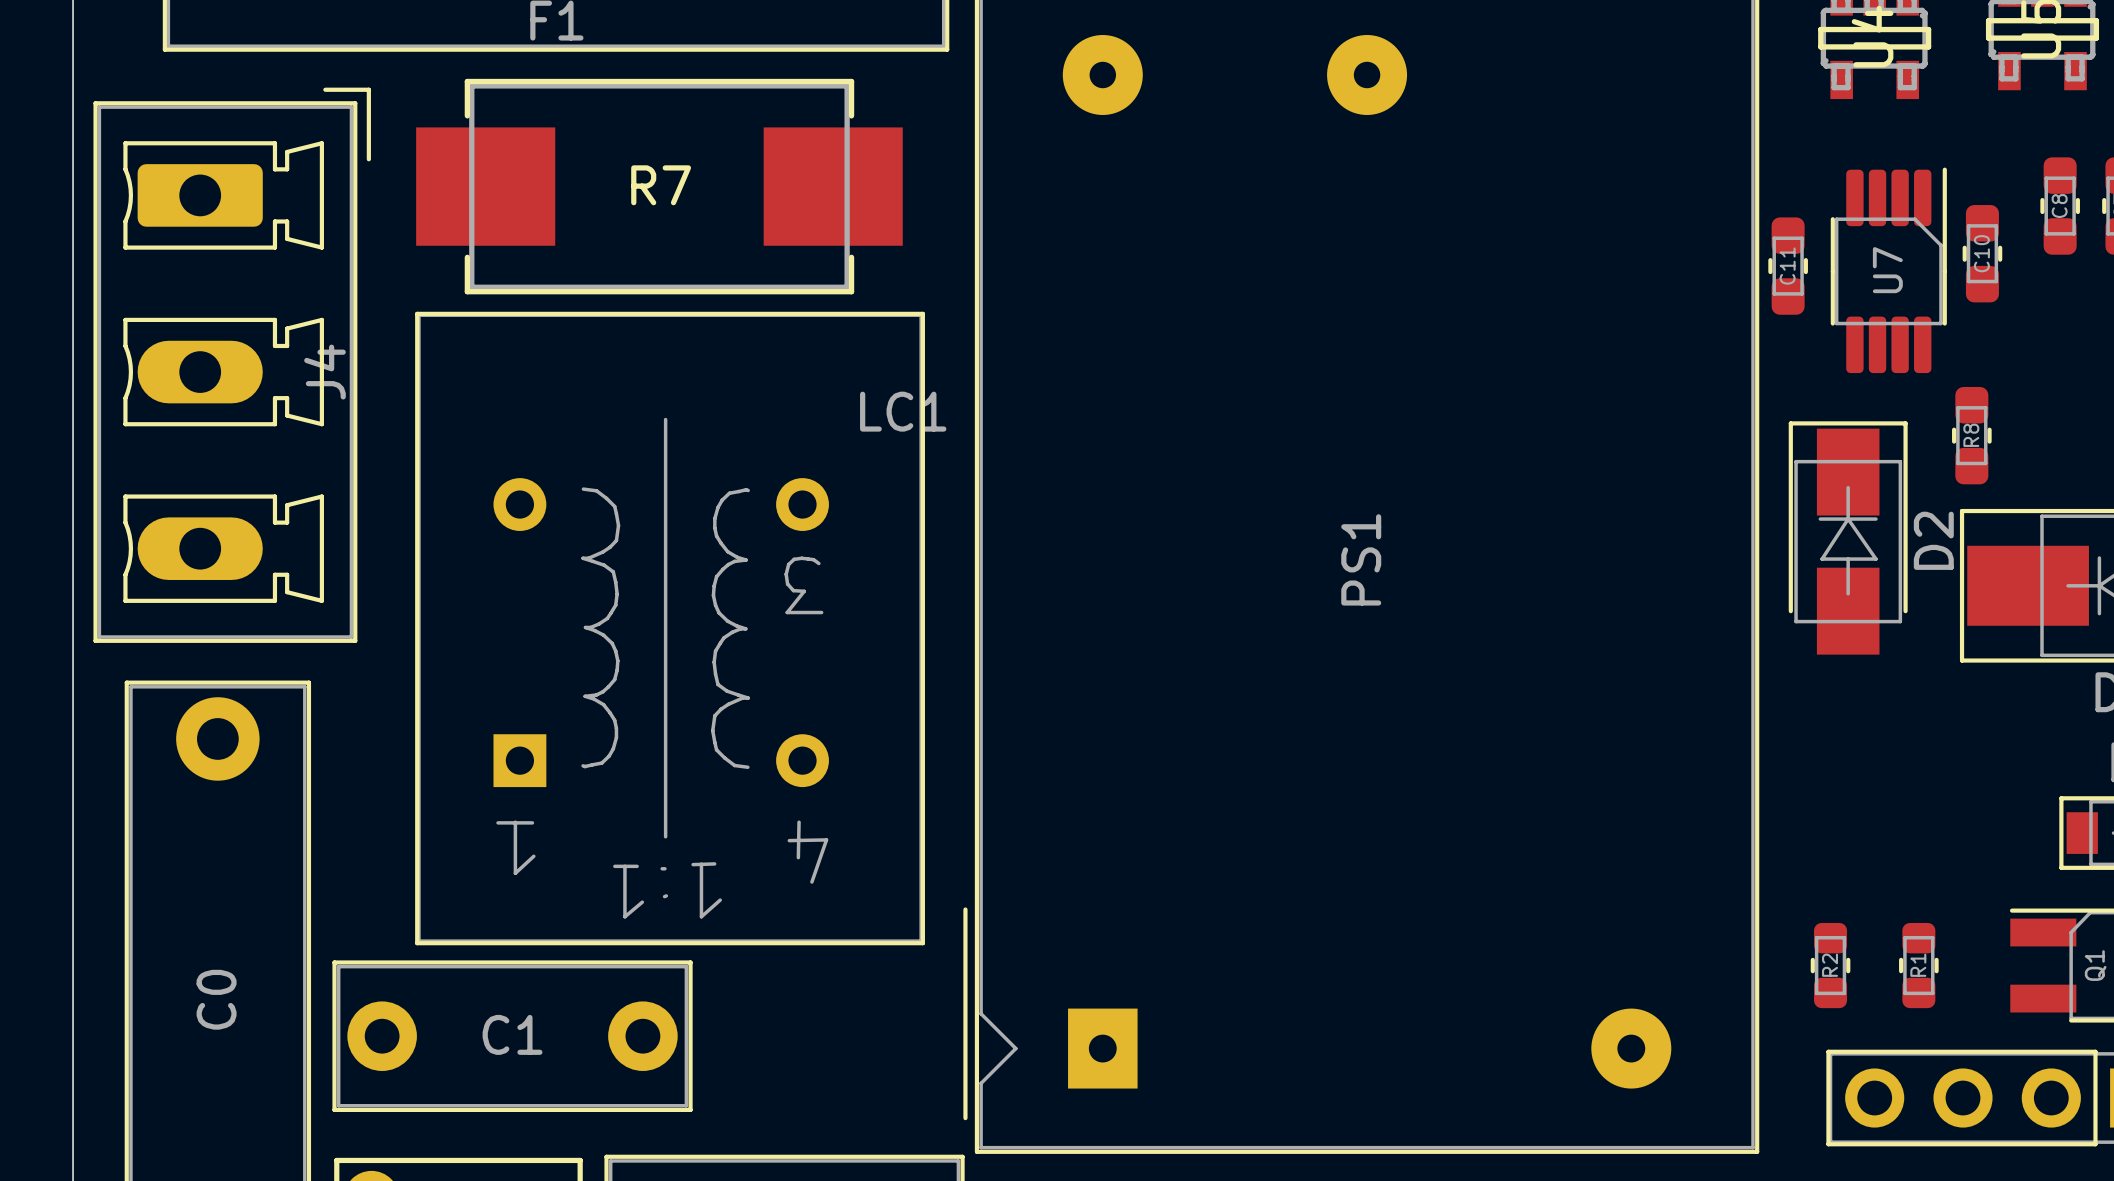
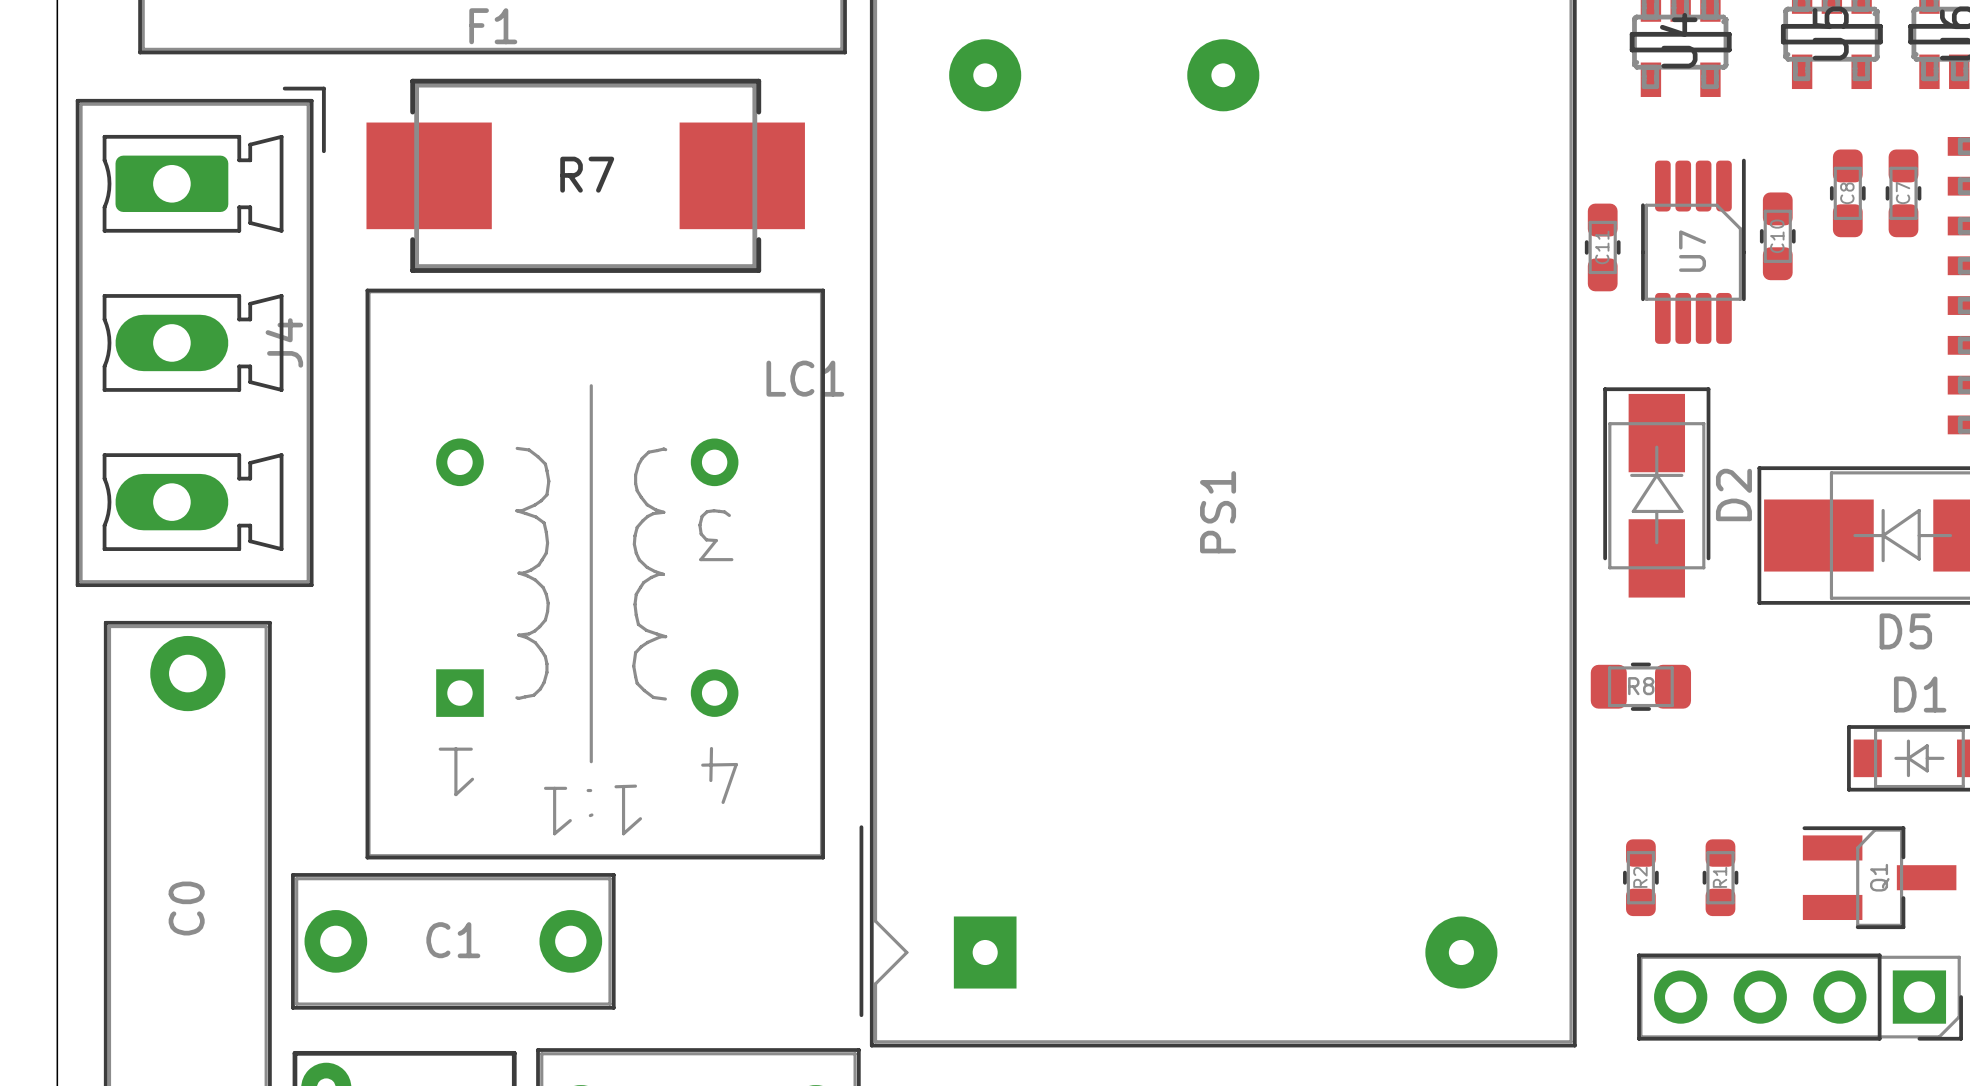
R8 footprint: [1952, 386, 1992, 485] -> [1590, 662, 1692, 711]

